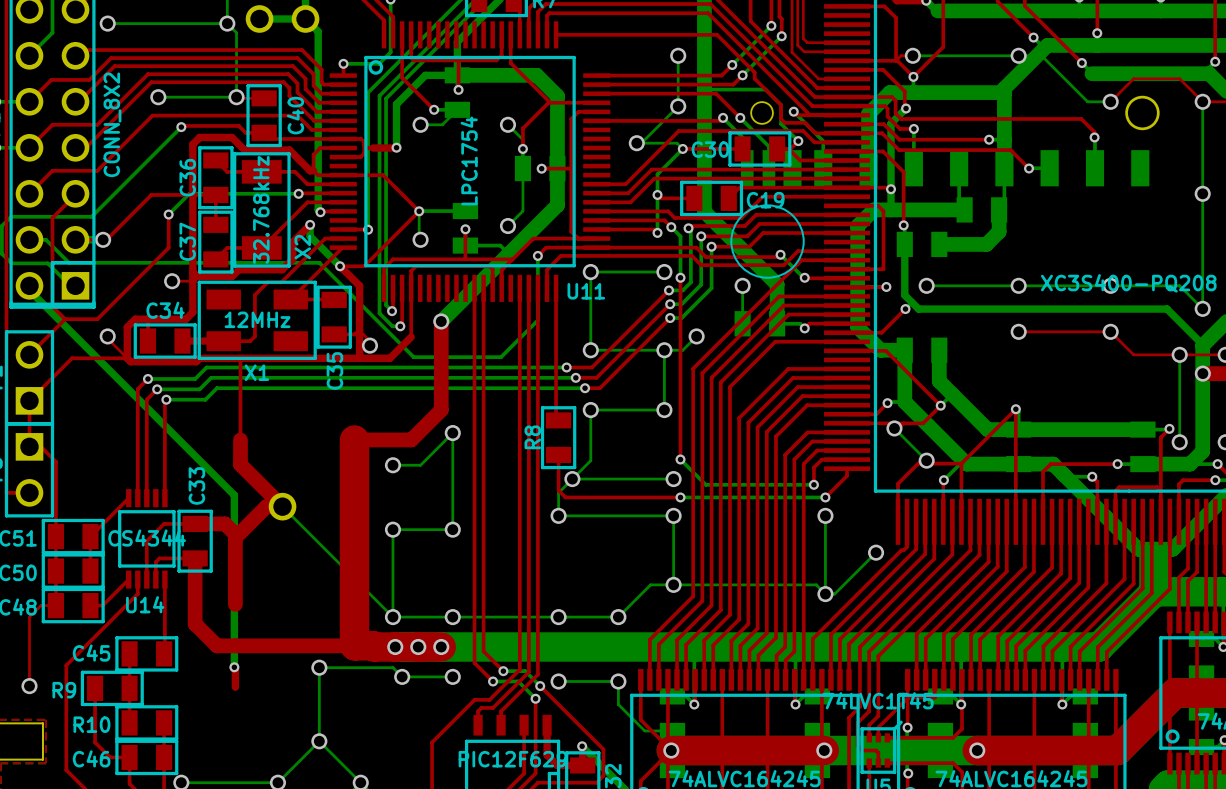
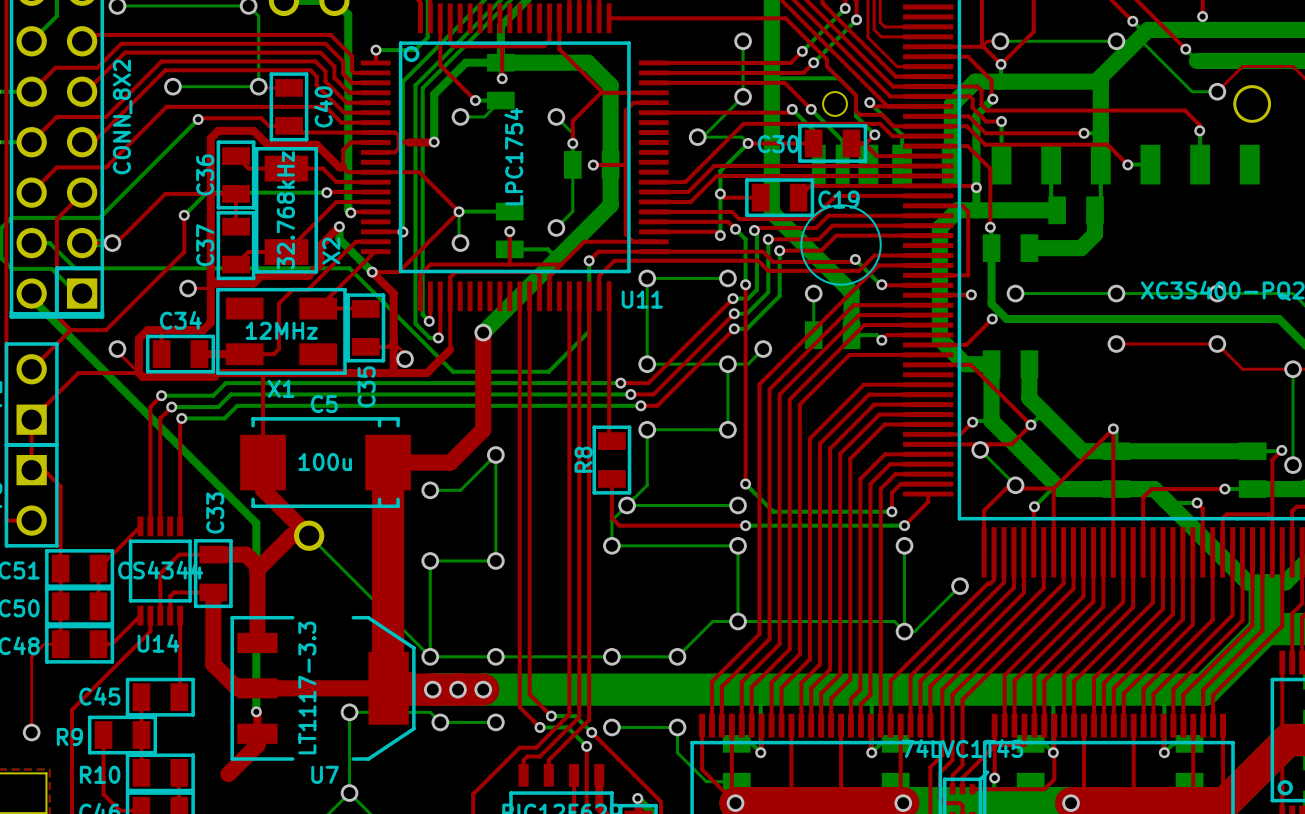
C5: none -> 100u (325, 462)
U7: none -> LT1117-3.3 (323, 688)
top track: none -> (257, 733) (257, 745) (228, 774)

